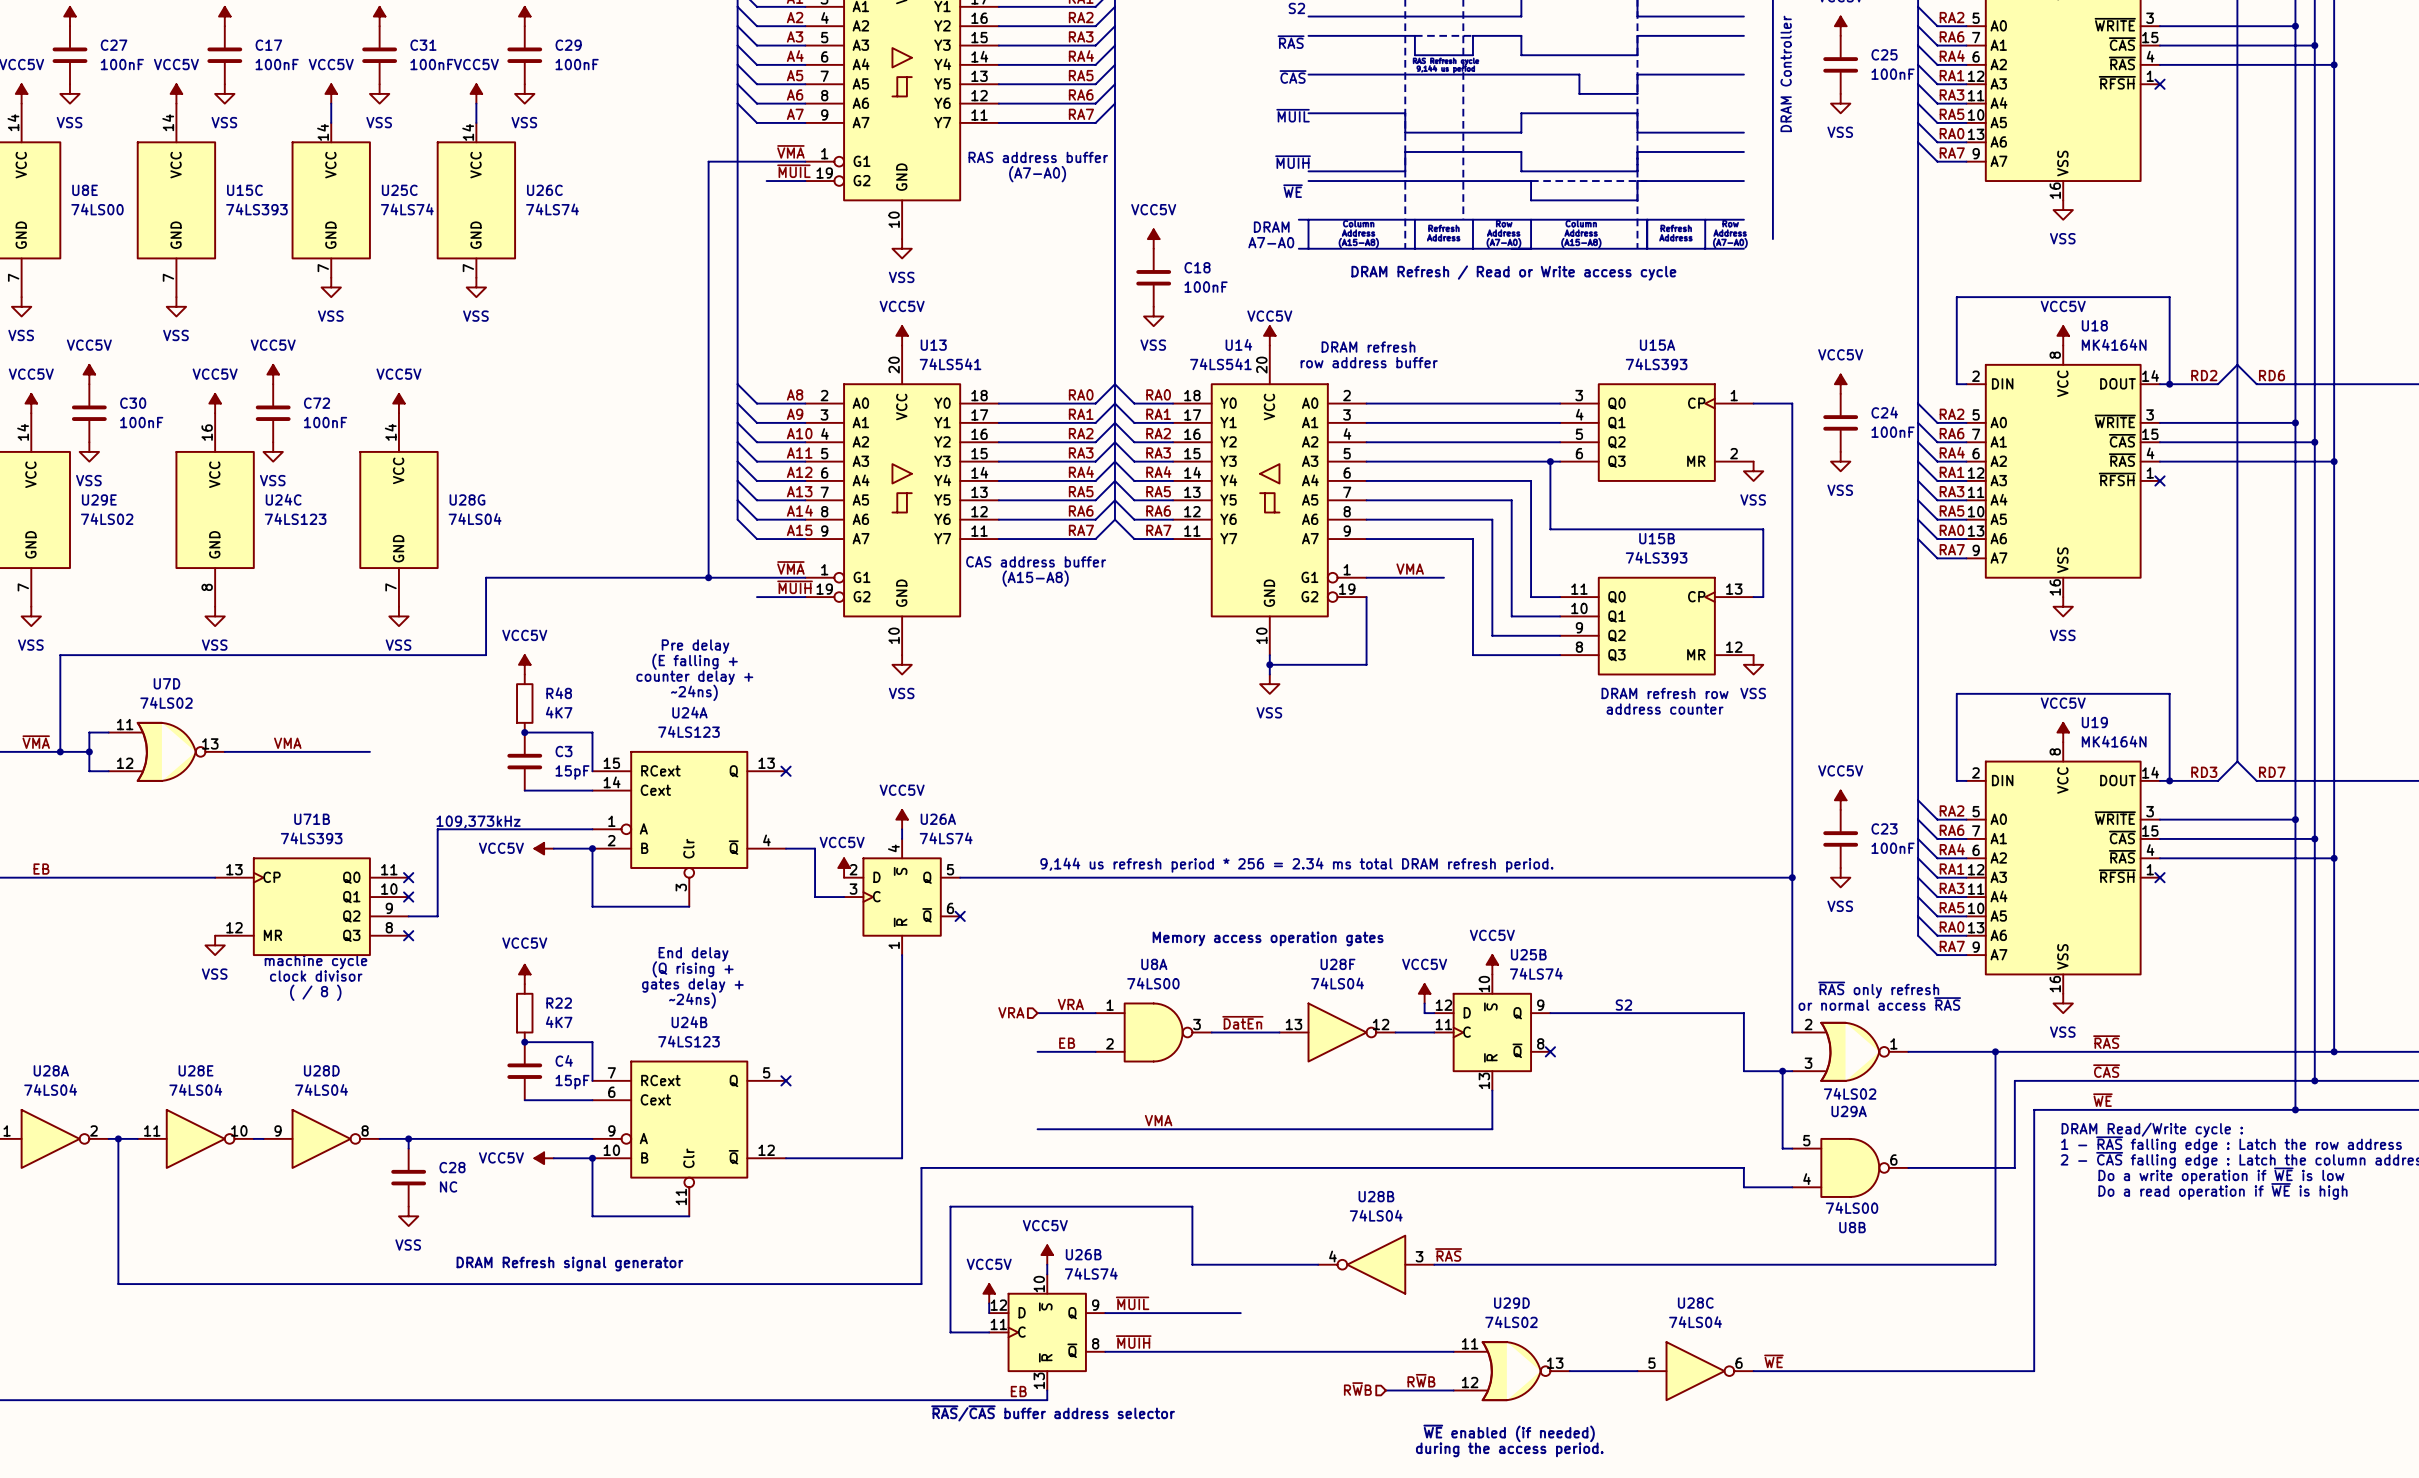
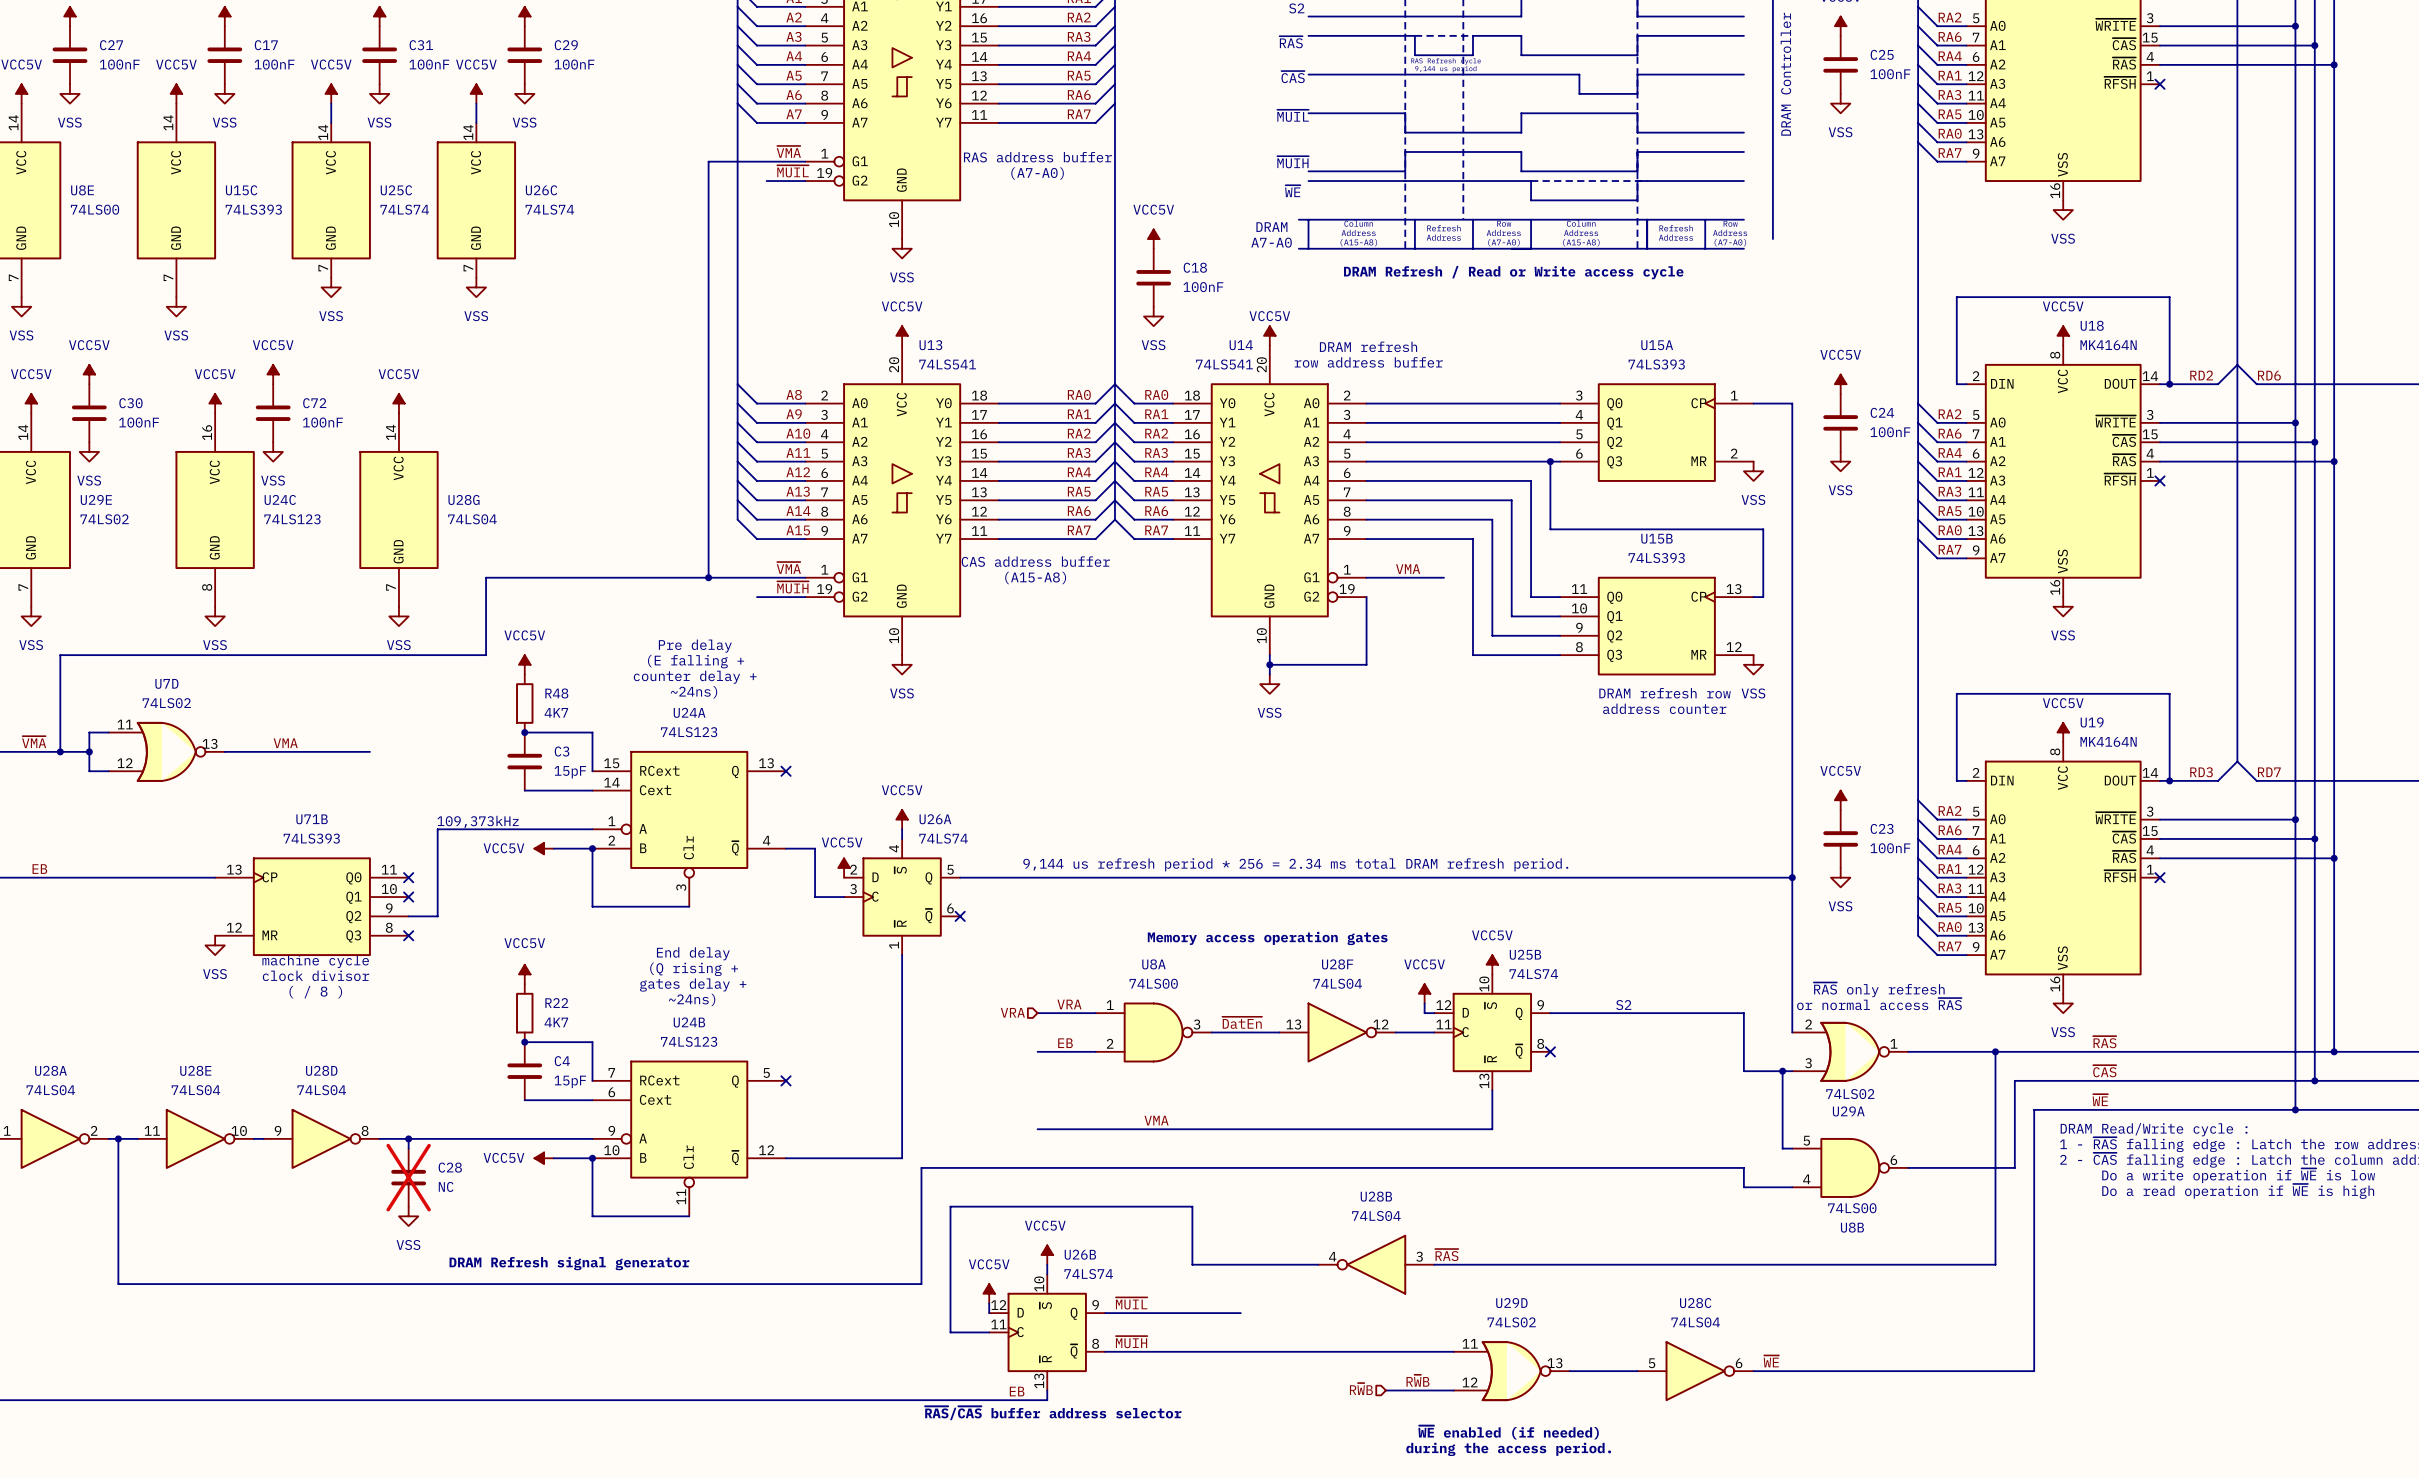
C28 do-not-place cross: none -> (408, 1177)

